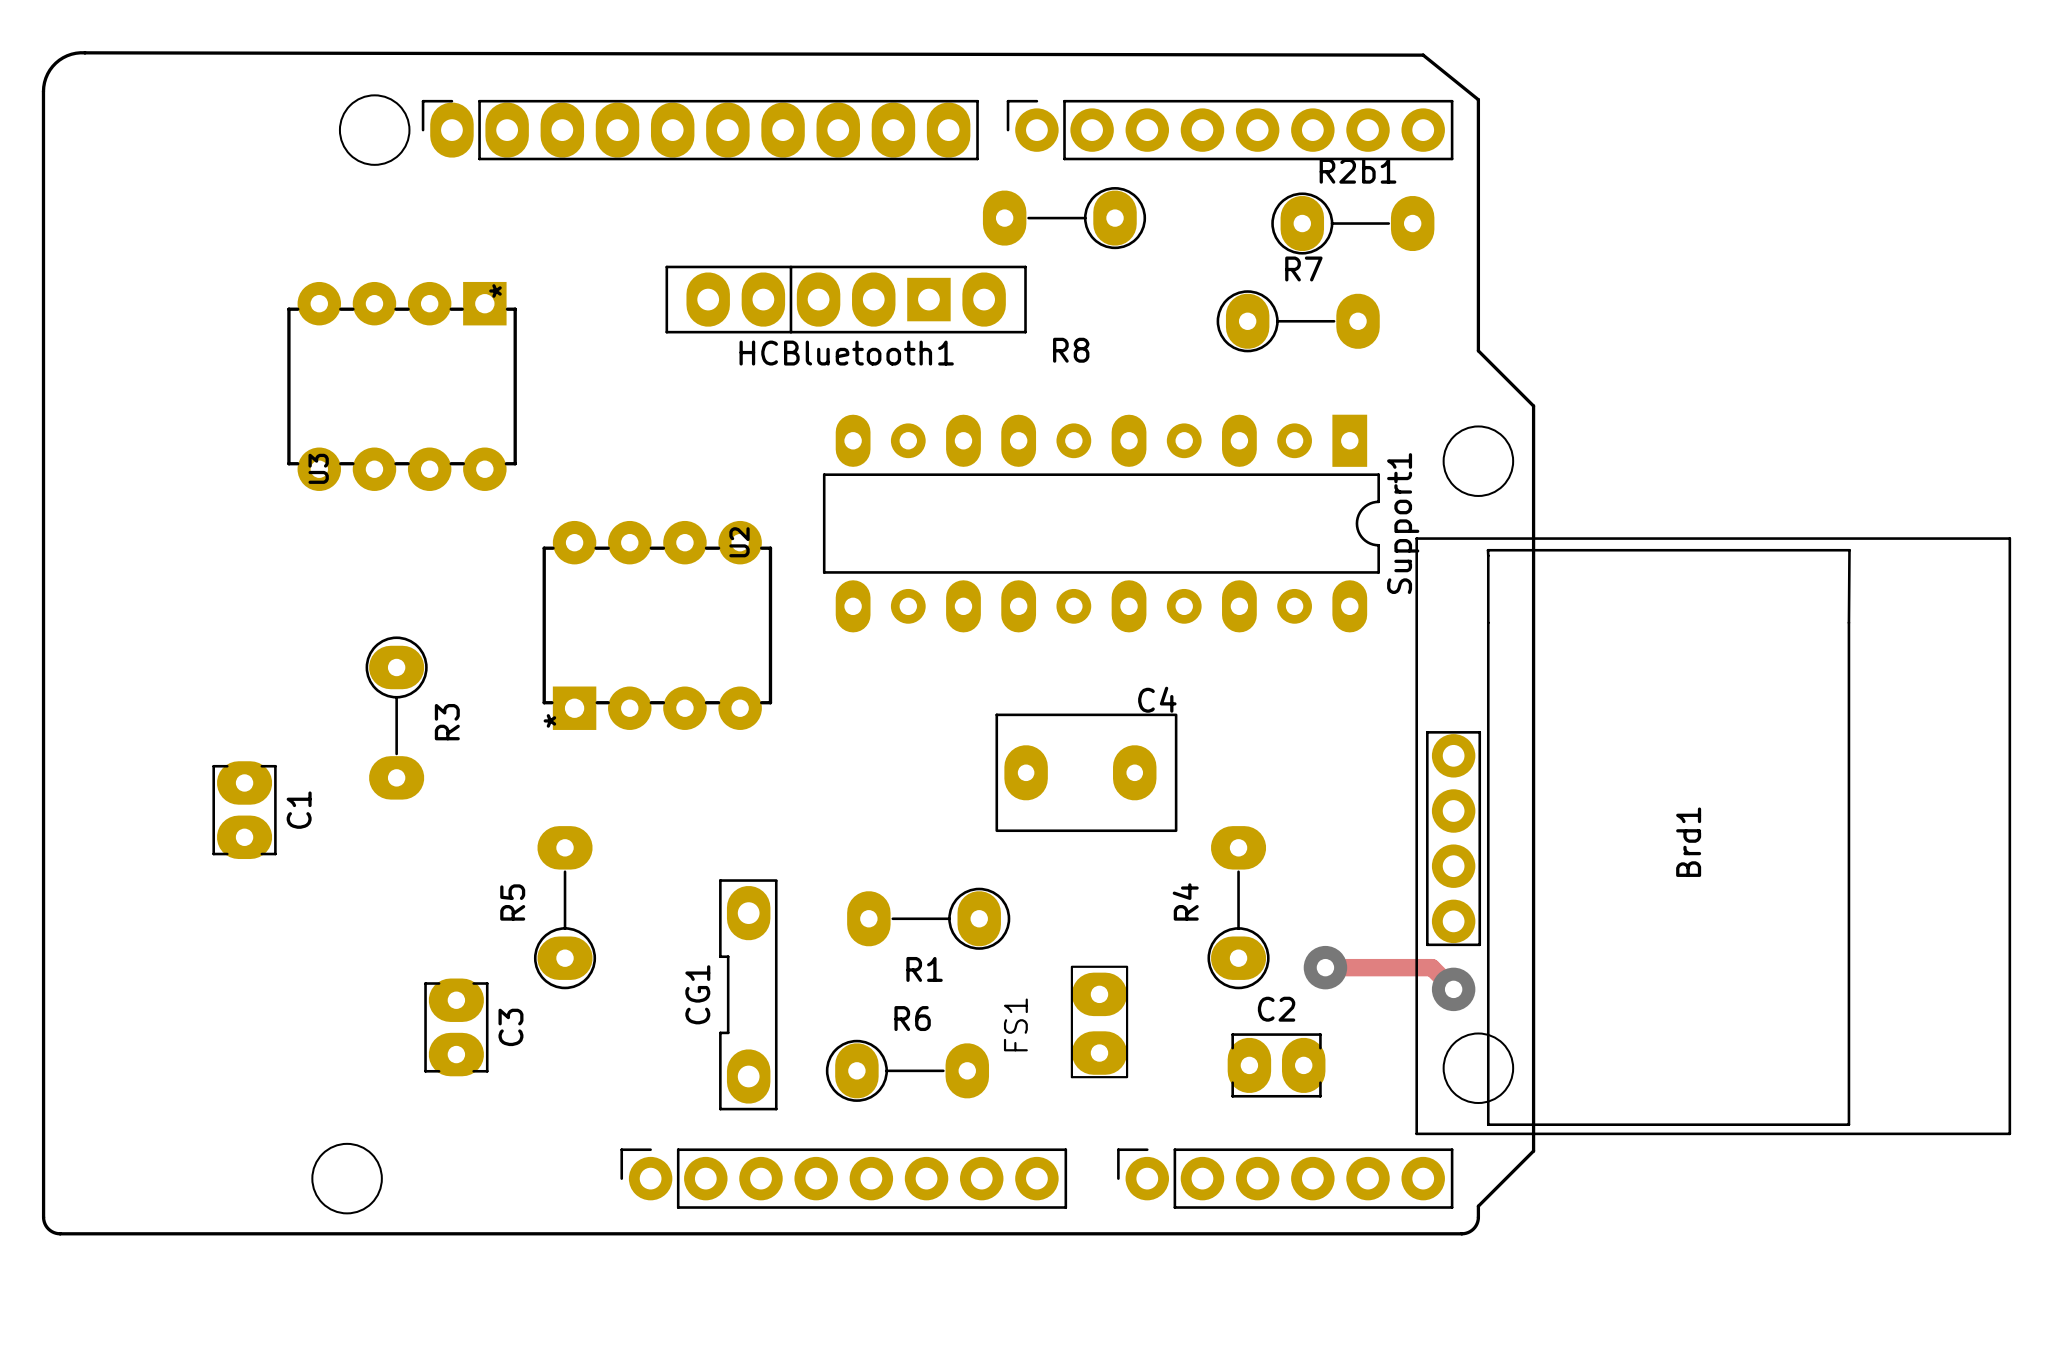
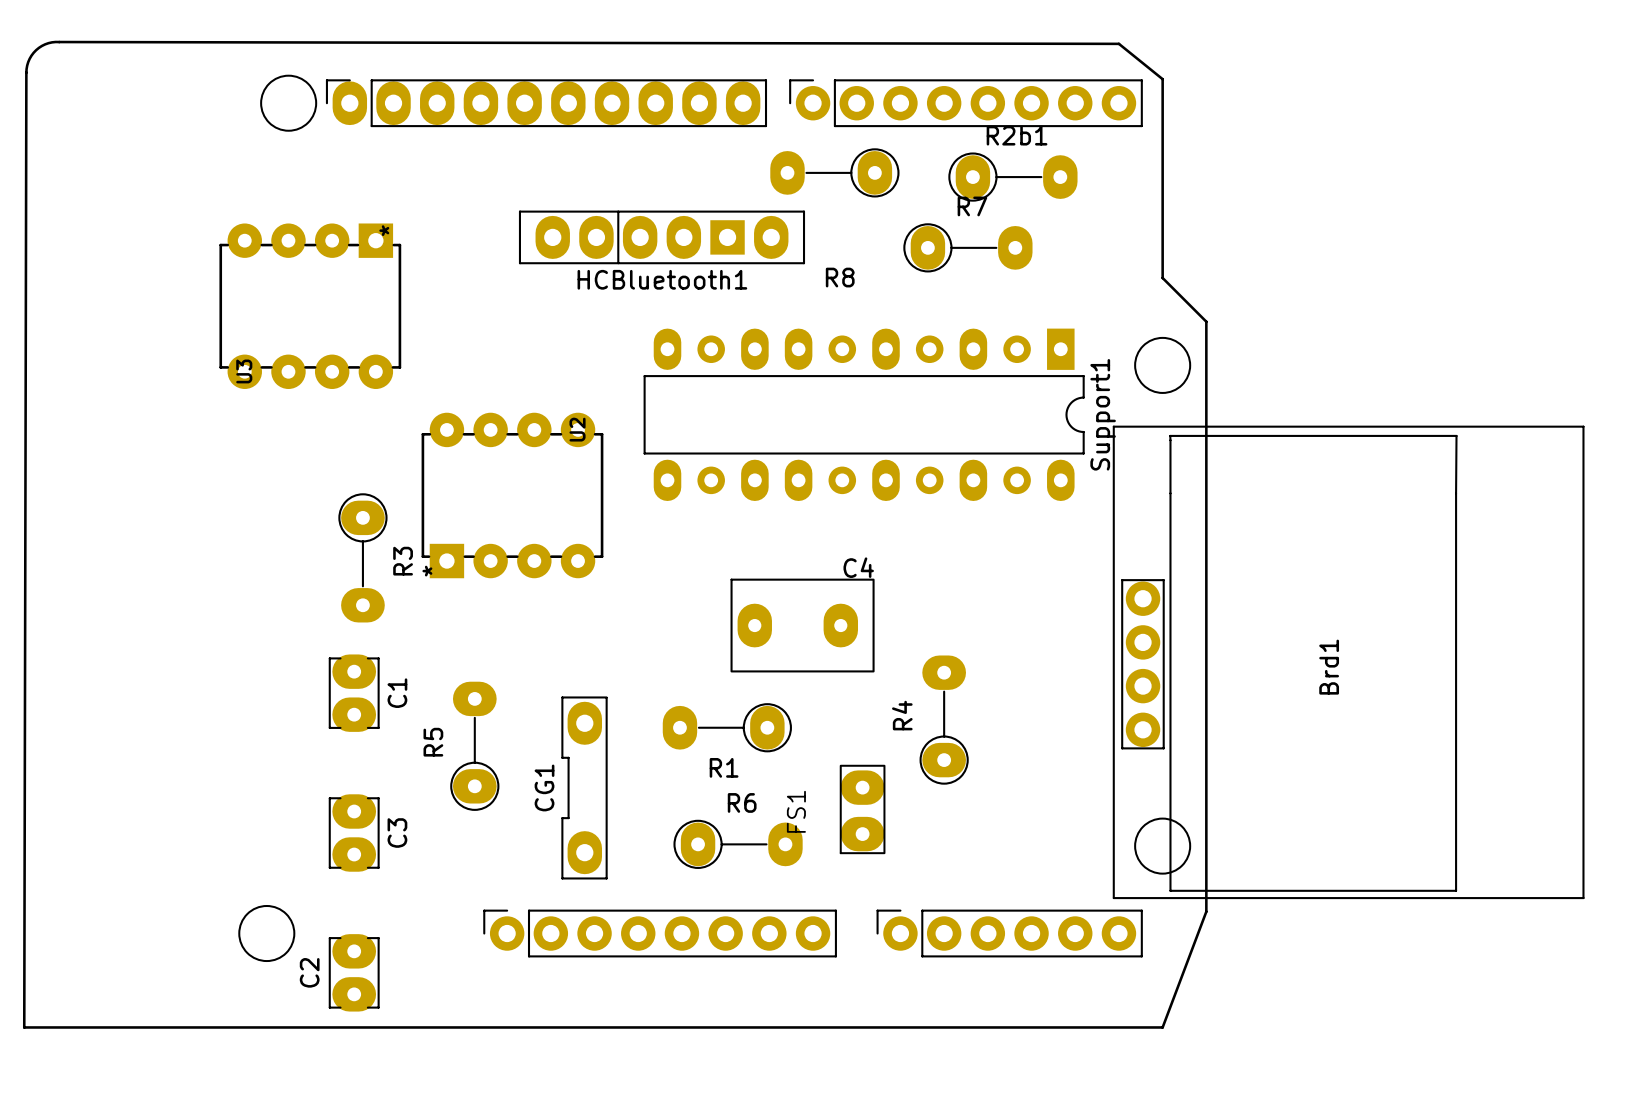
board edge: (43, 91) (43, 1217) (45, 1225) (50, 1230) (60, 1233) (1461, 1233) (1470, 1231) (1474, 1227) (1478, 1219) (1478, 1206) (1533, 1151) -> (26, 72) (24, 1027) (1162, 1027) (1206, 911)
R2b1 position: (1352, 223) -> (1012, 177)
R7 position: (1298, 321) -> (967, 247)
R3 position: (396, 718) -> (362, 557)
C4 position: (1086, 772) -> (802, 625)
C1 position: (244, 810) -> (354, 693)
R5 position: (565, 907) -> (474, 746)
R4 position: (1238, 907) -> (944, 720)
track: (1325, 967) (1431, 967) (1453, 989) -> none
via: (1325, 967) -> none
via: (1453, 989) -> none
C2 name position: C2 (1276, 1009) -> C2 (309, 972)
C3 position: (456, 1027) -> (354, 833)
C2 rotation: 0° (1276, 1065) -> 90° clockwise (354, 972)
C2 position: (1276, 1065) -> (354, 972)
R6 position: (907, 1070) -> (738, 844)

